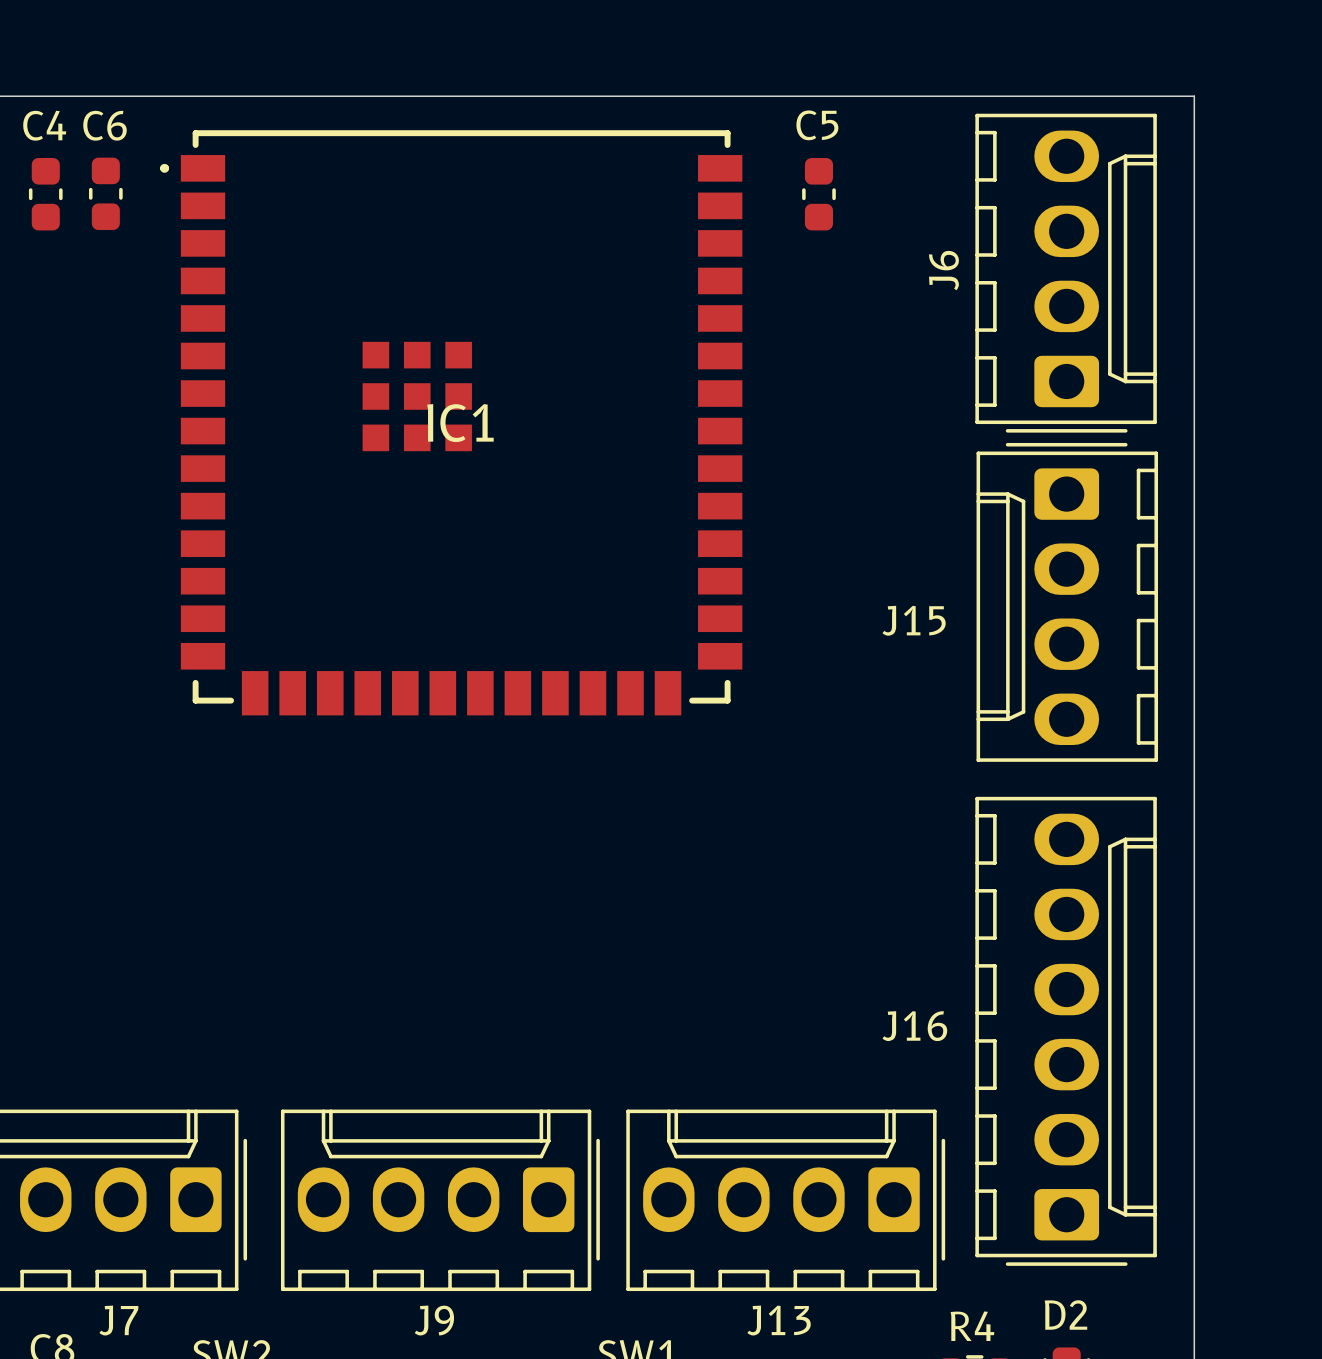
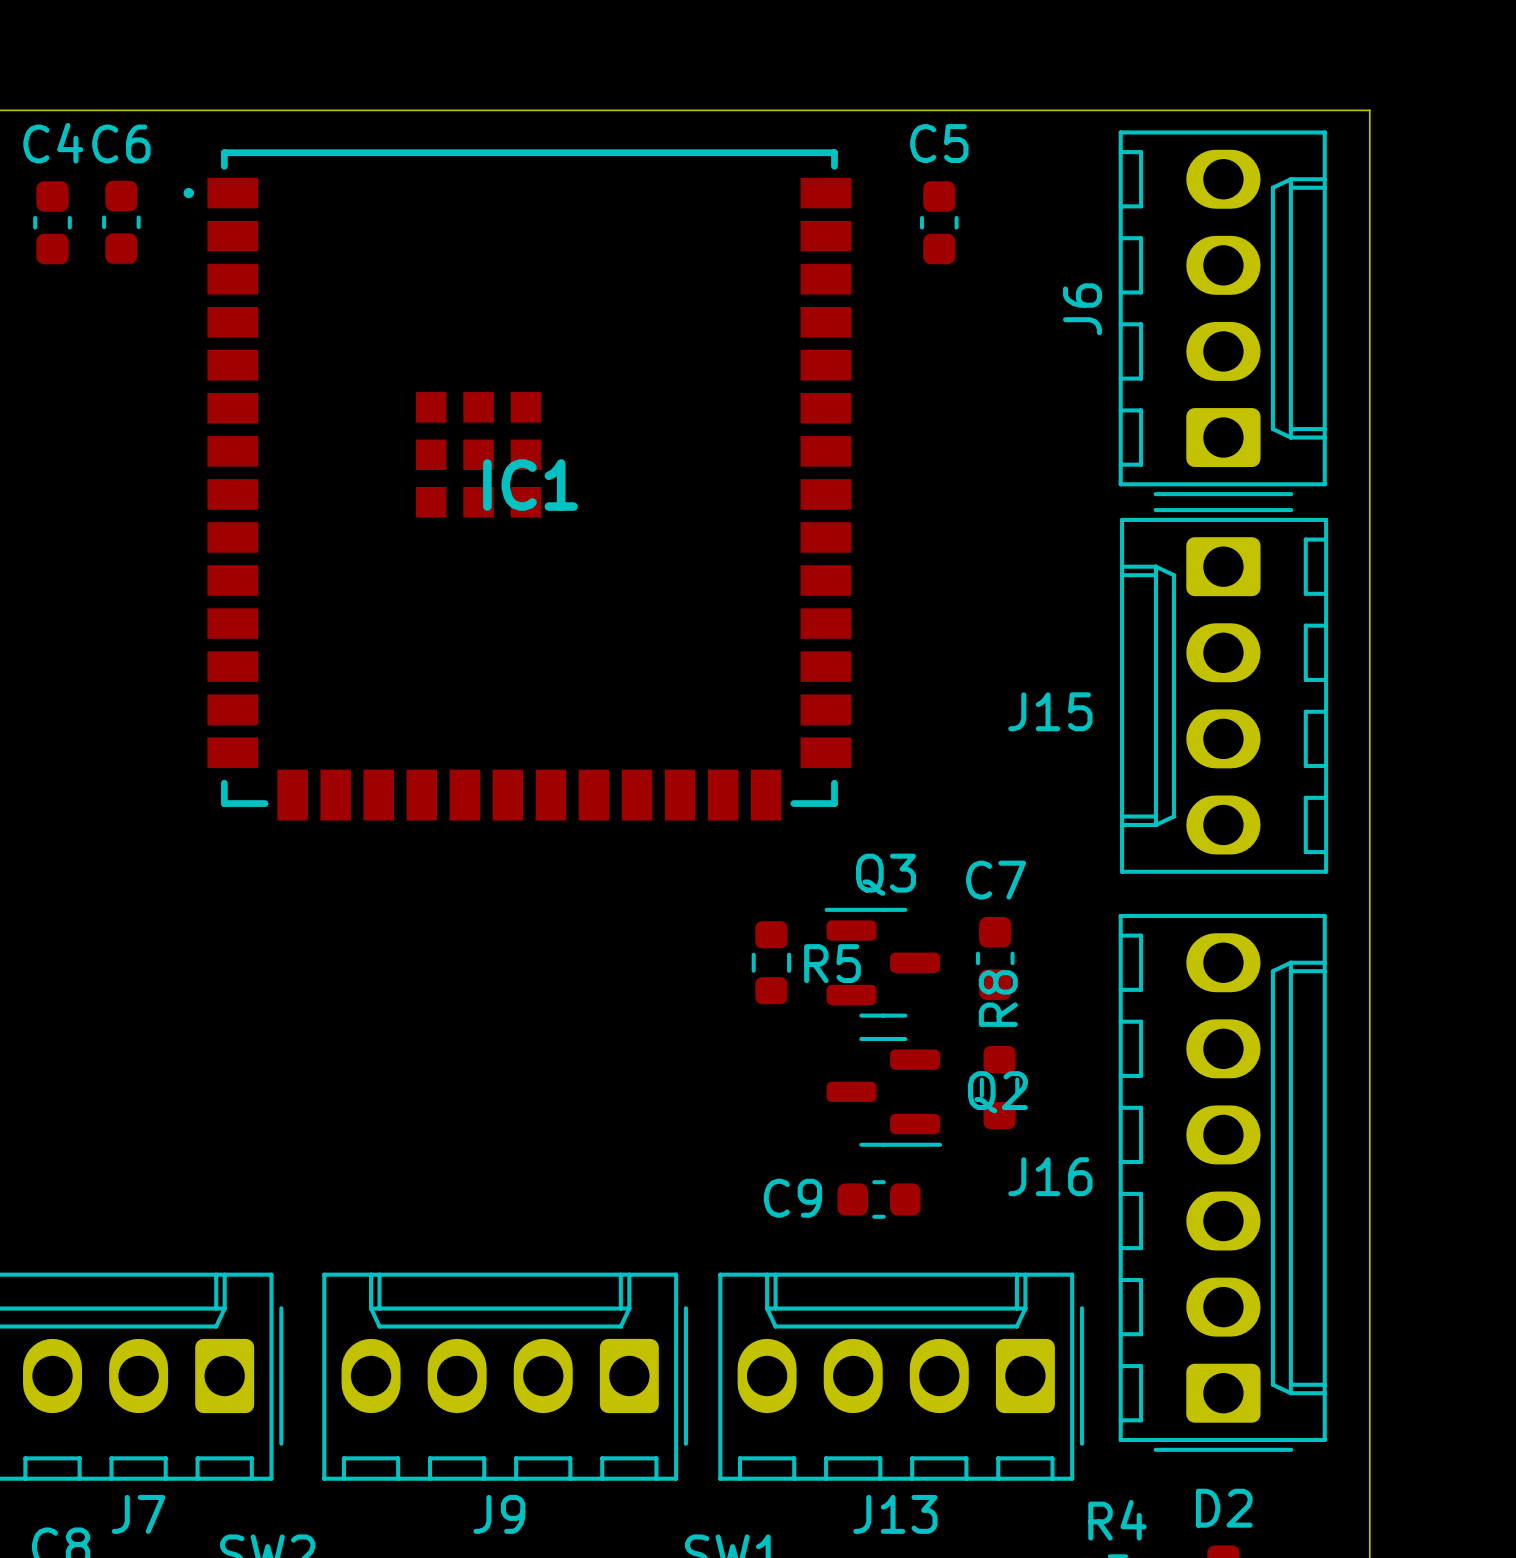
C7: none -> (995, 958)
R5: none -> (771, 962)
Q3: none -> (882, 962)
R8: none -> (999, 1087)
Q2: none -> (884, 1091)
C9: none -> (879, 1199)

